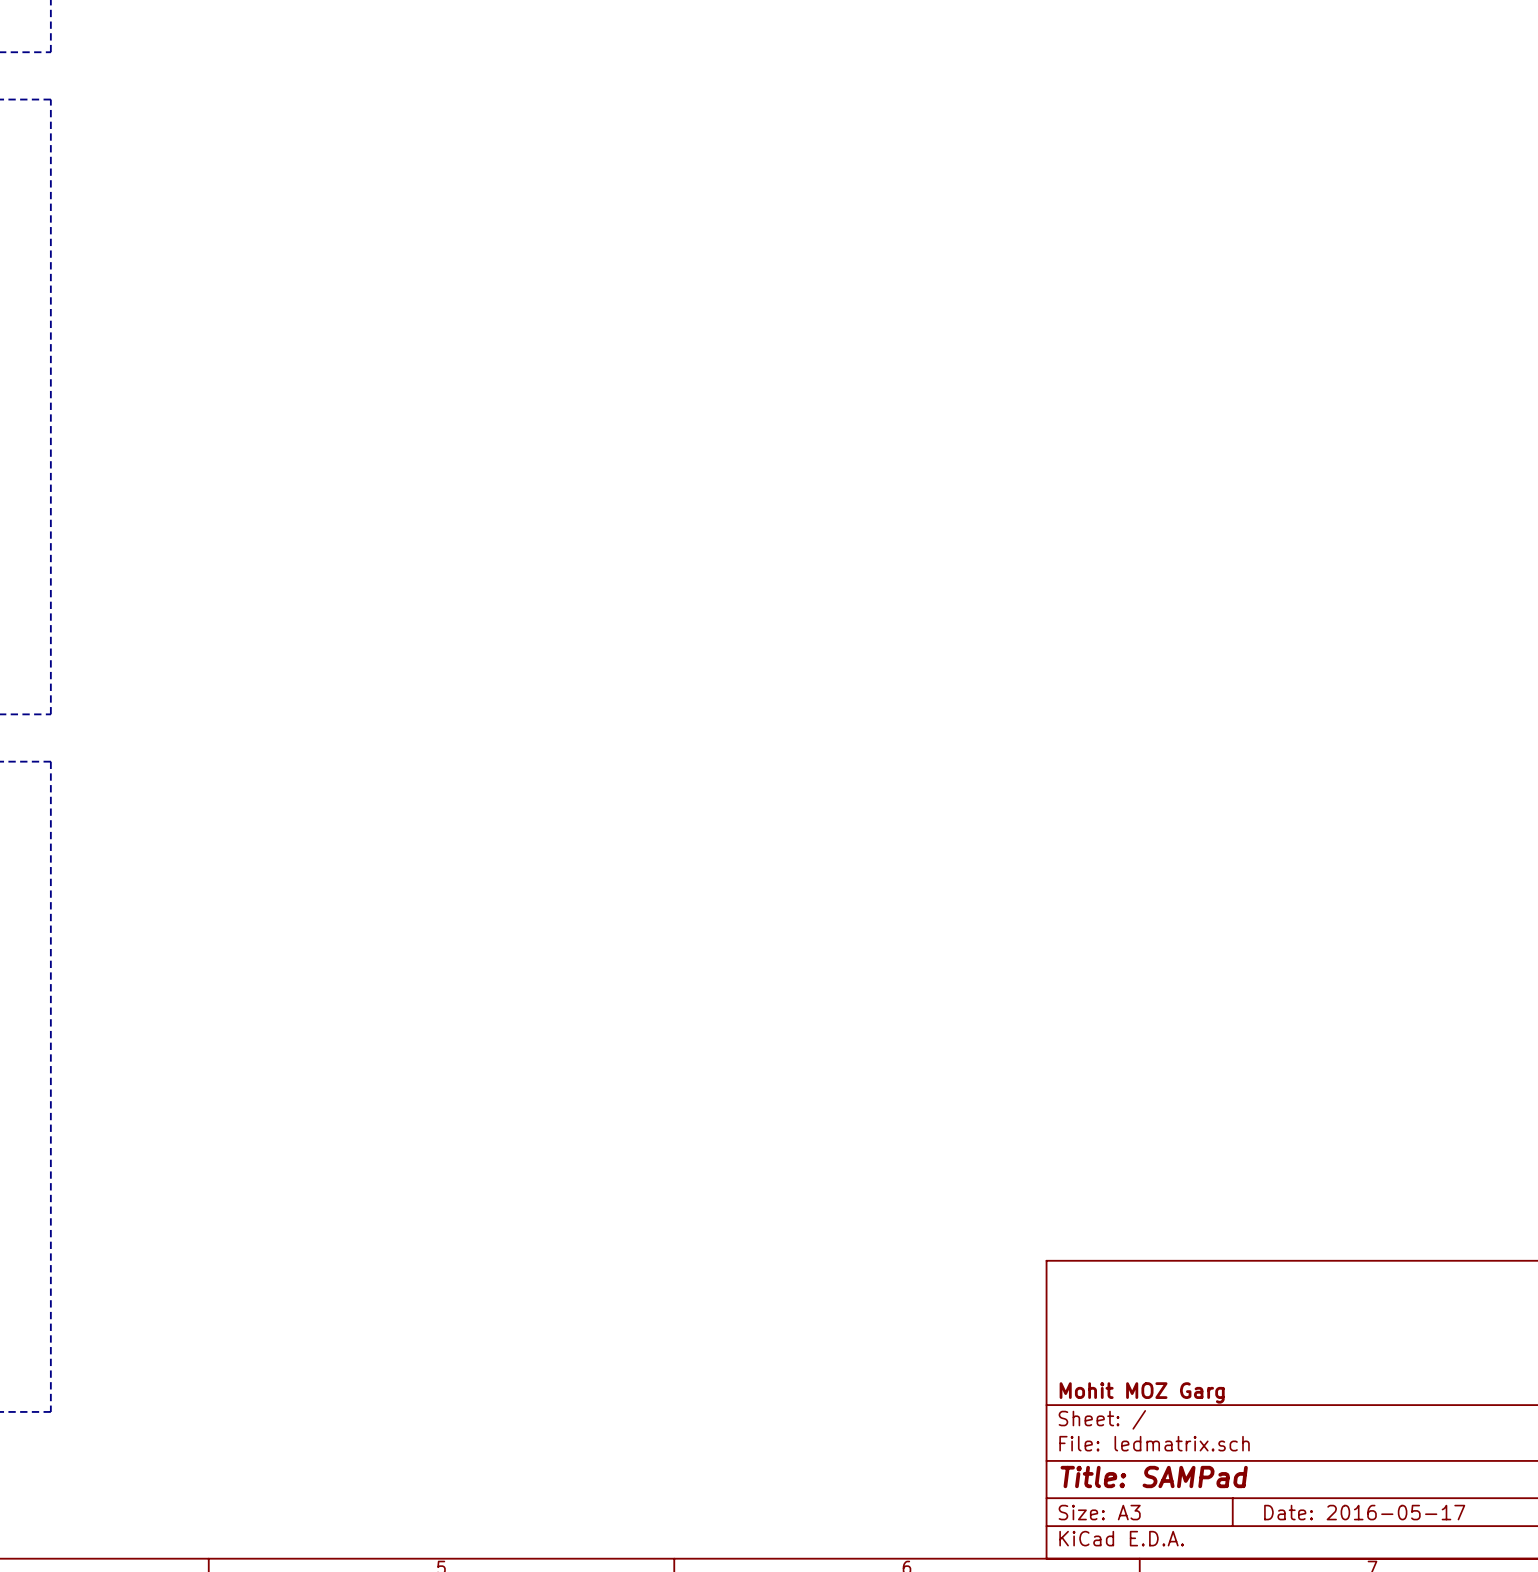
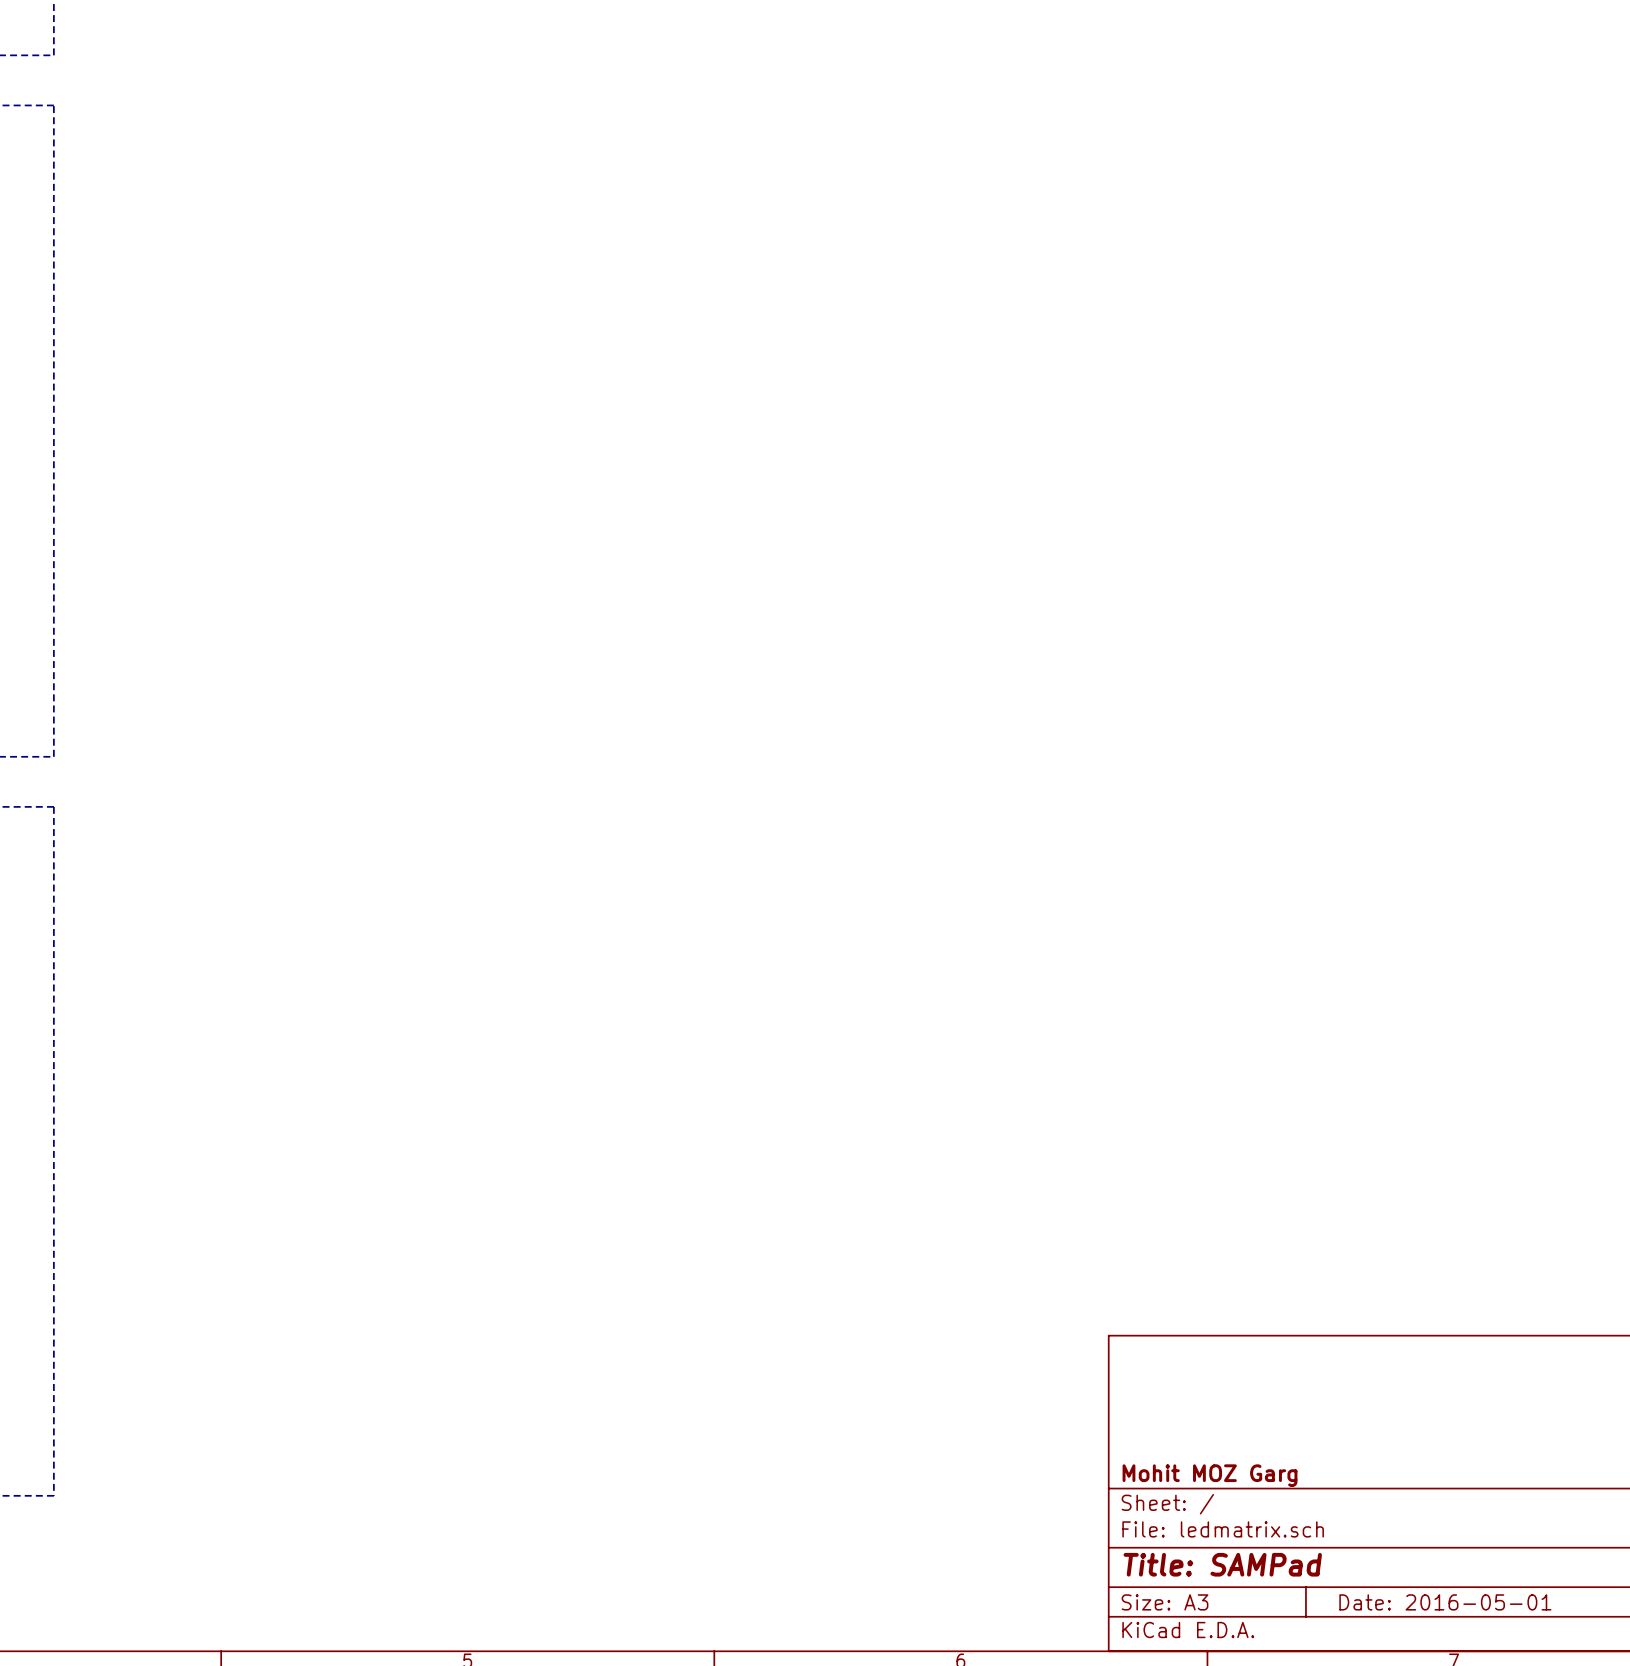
title block: Date: 2016-05-17 (1364, 1512) -> Date: 2016-05-01 (1445, 1602)

